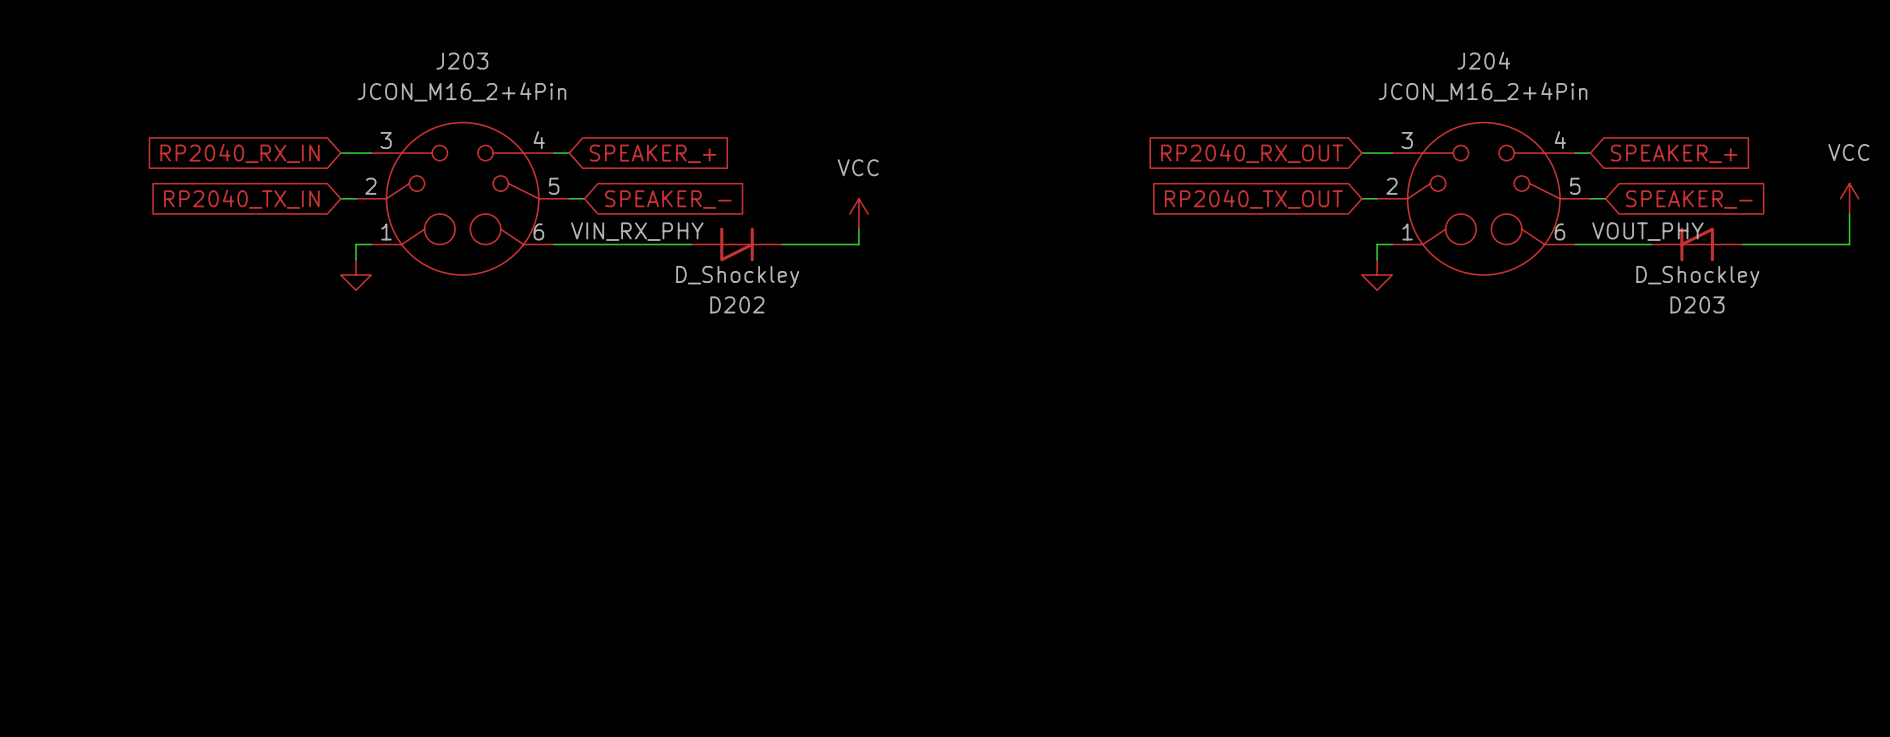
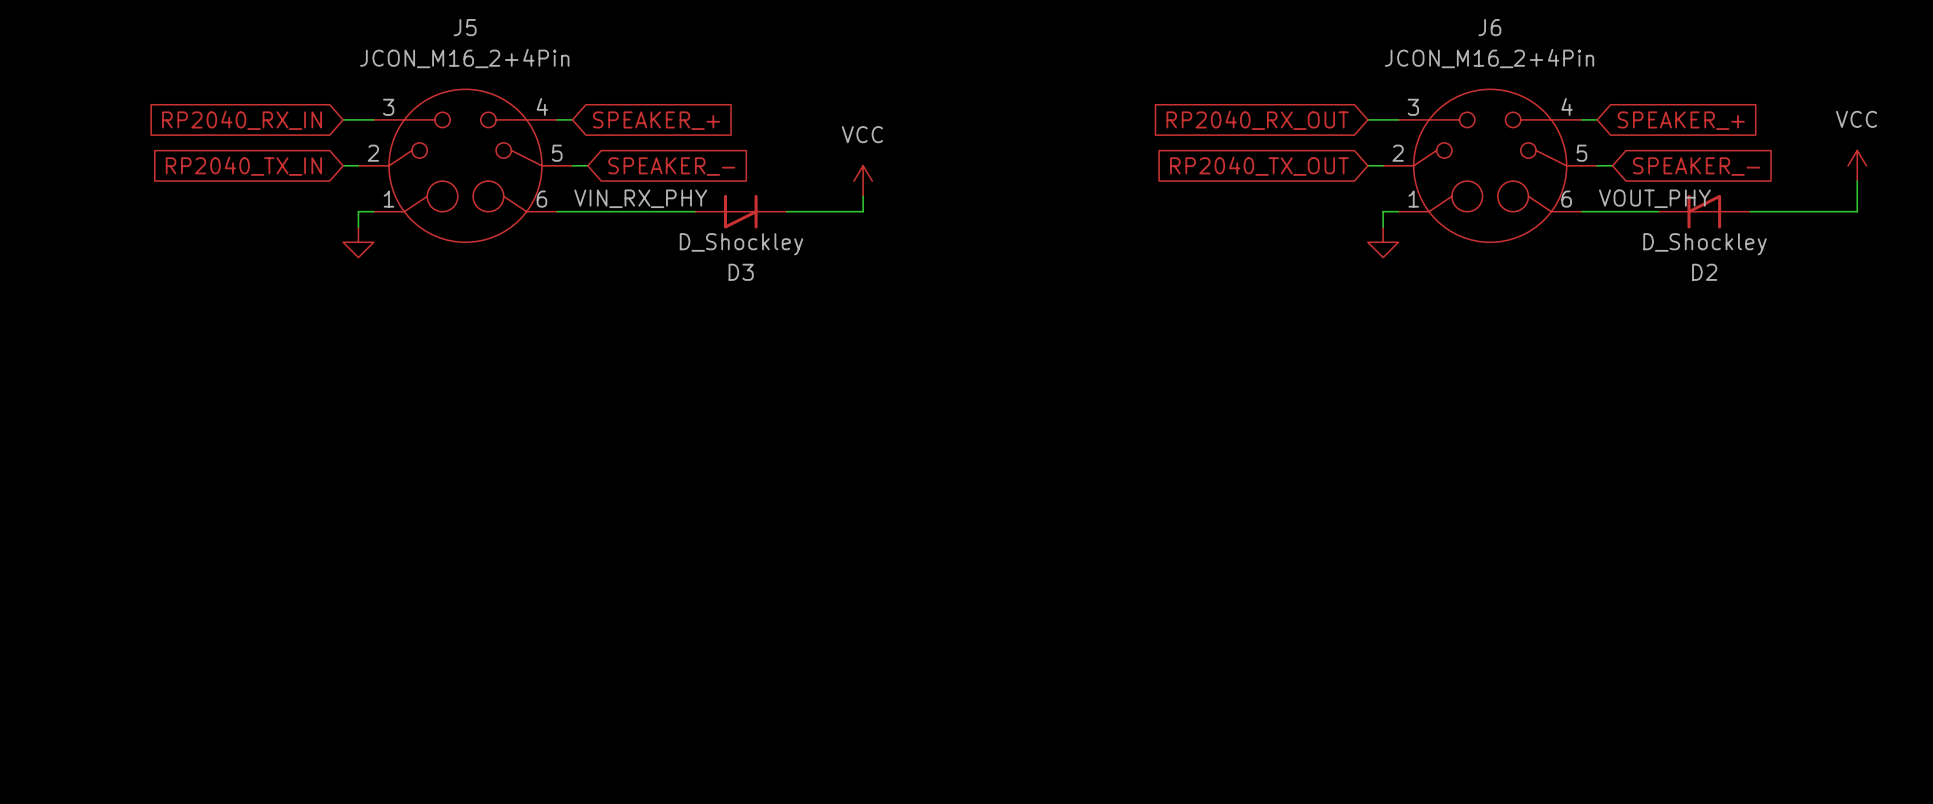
J204 name: J204 (1483, 60) -> J6 (1489, 27)
J203 name: J203 (462, 61) -> J5 (465, 27)
D202 name: D202 (737, 304) -> D3 (741, 272)
D203 name: D203 (1697, 304) -> D2 (1704, 272)

